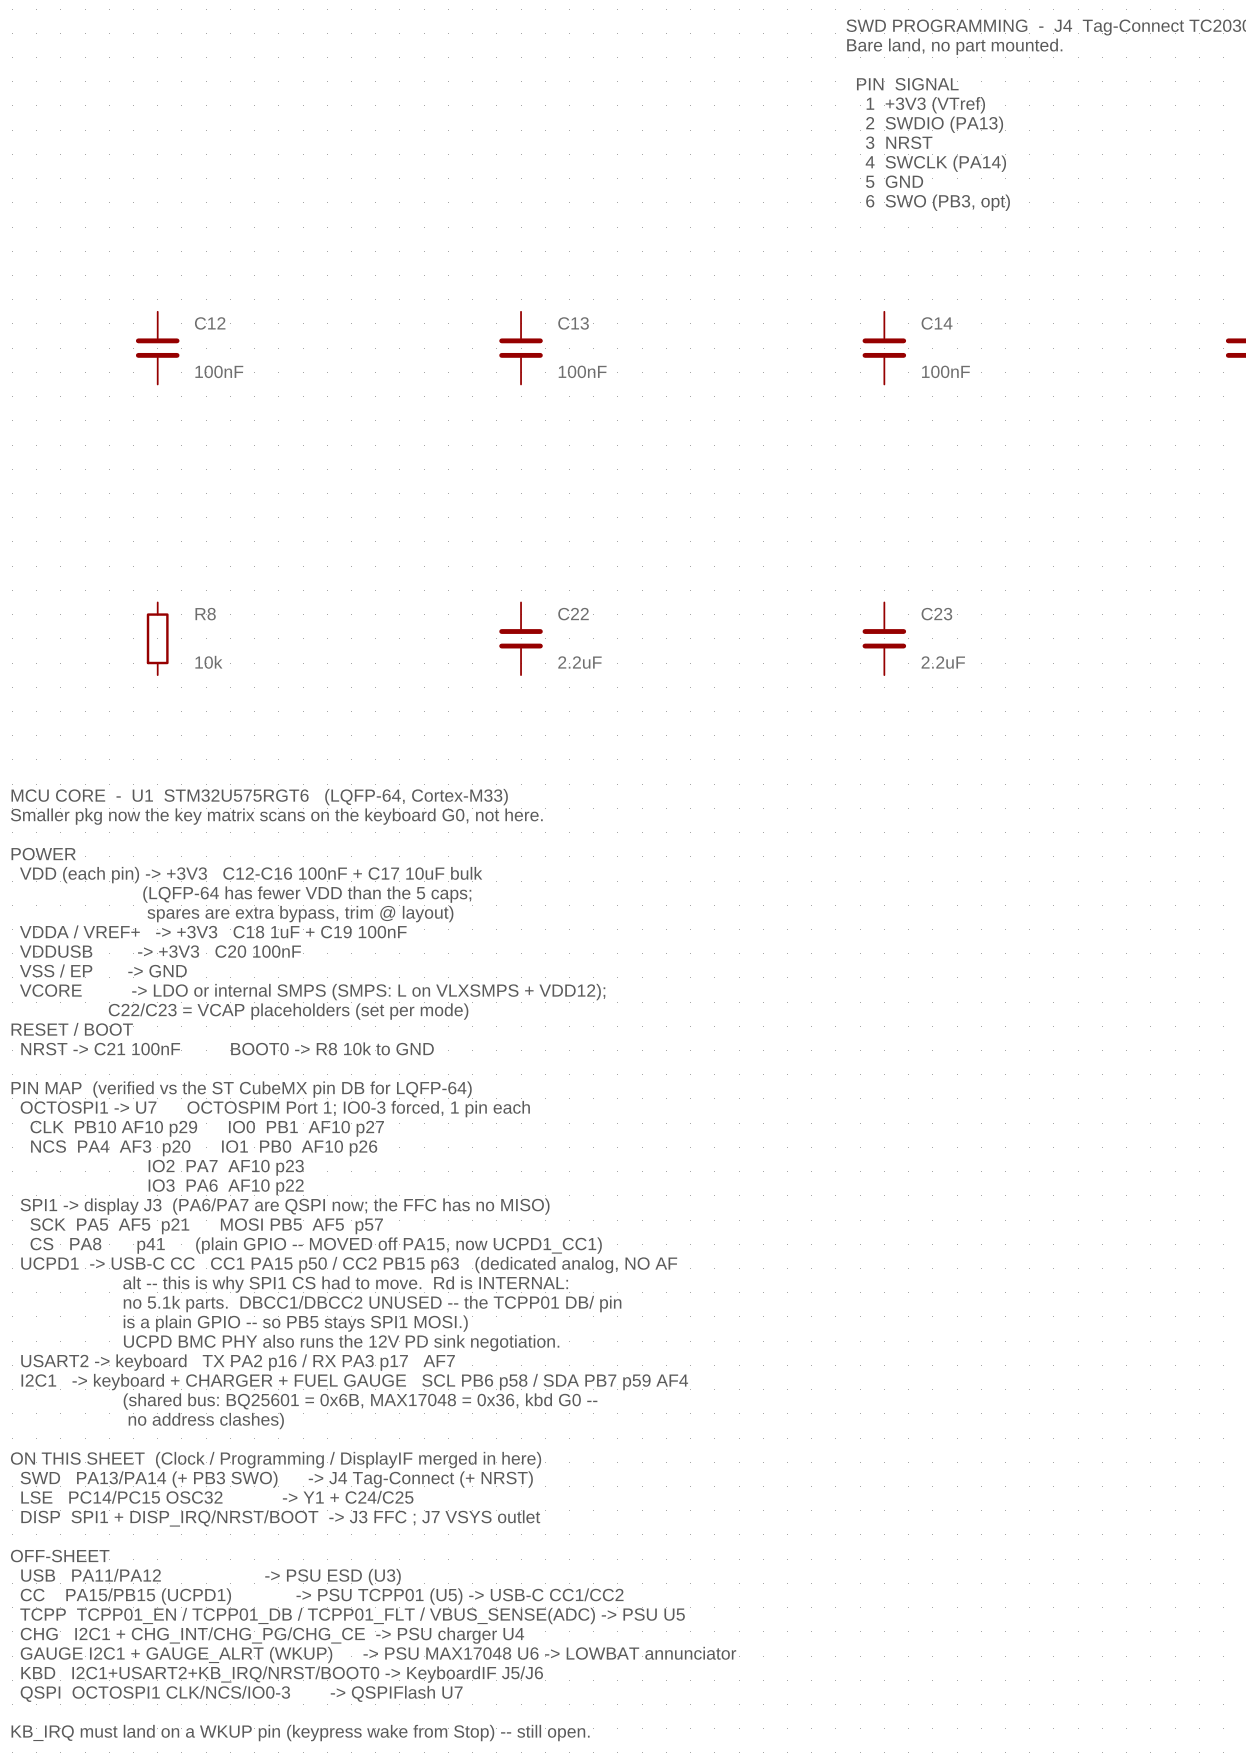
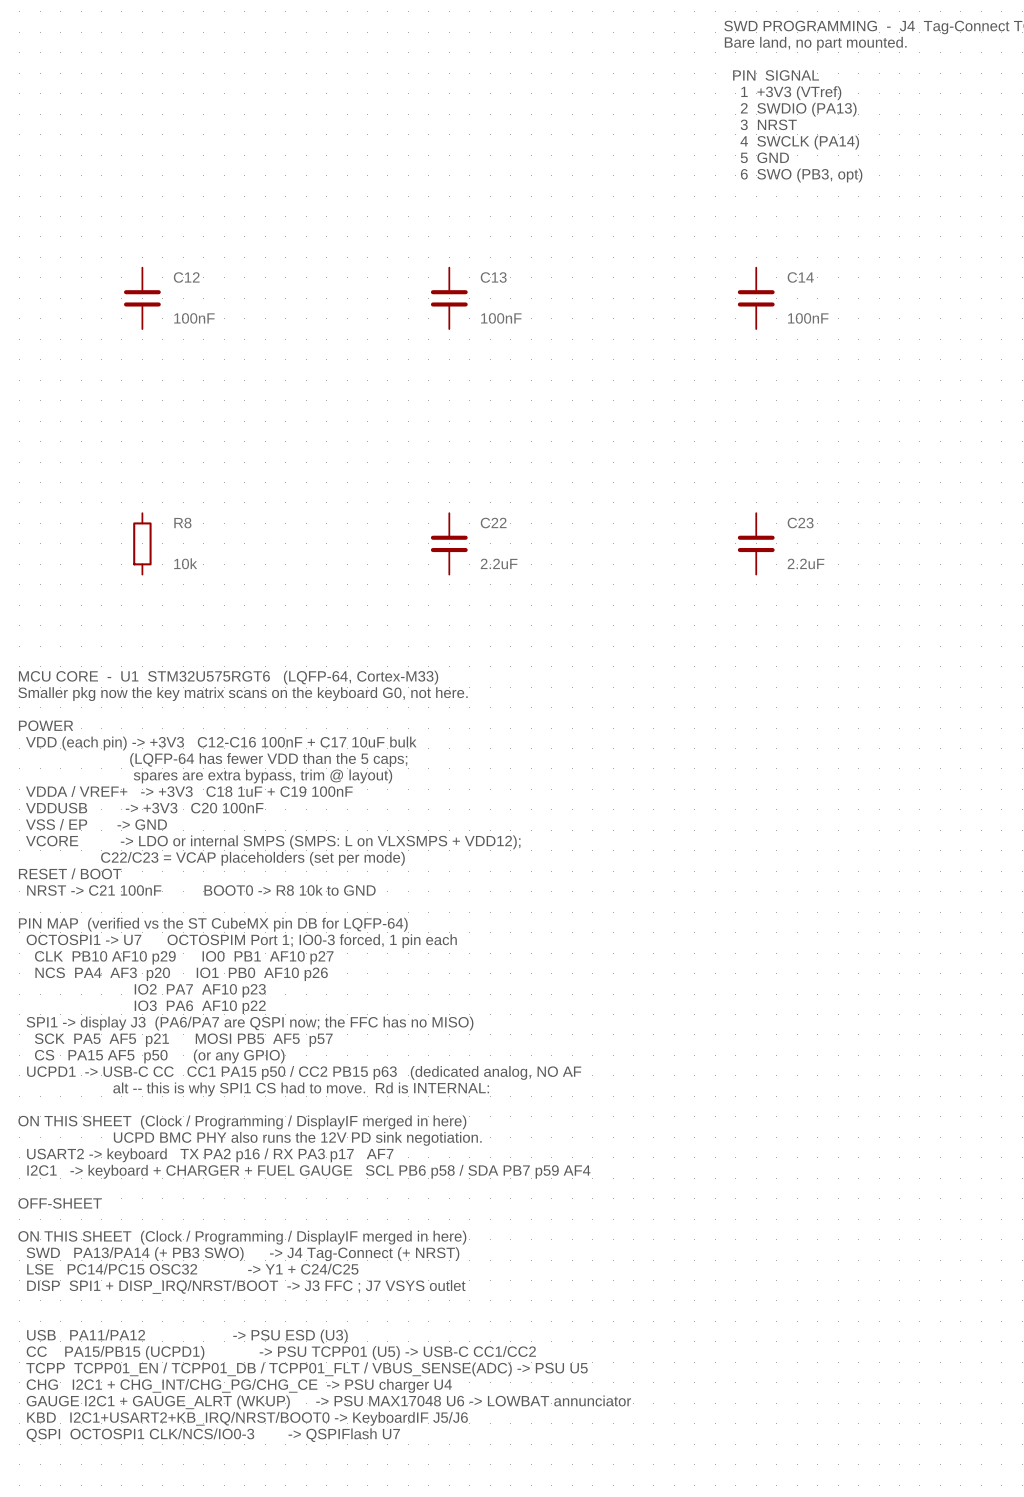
text: CS PA8 p41 (plain GPIO -- MOVED off PA15, now UCPD1_CC1) (316, 1245) -> CS PA15 AF5 p50 (or any GPIO) (159, 1056)
text: no 5.1k parts. DBCC1/DBCC2 UNUSED -- the TCPP01 DB/ pin (372, 1304) -> none
text: is a plain GPIO -- so PB5 stays SPI1 MOSI.) (295, 1323) -> ON THIS SHEET (Clock / Programming / DisplayIF merged in here) (242, 1122)
text: (shared bus: BQ25601 = 0x6B, MAX17048 = 0x36, kbd G0 -- (360, 1401) -> none
text: no address clashes) (206, 1421) -> OFF-SHEET (60, 1203)
text: OFF-SHEET (60, 1556) -> none
text: KB_IRQ must land on a WKUP pin (keypress wake from Stop) -- still open. (300, 1733) -> none

